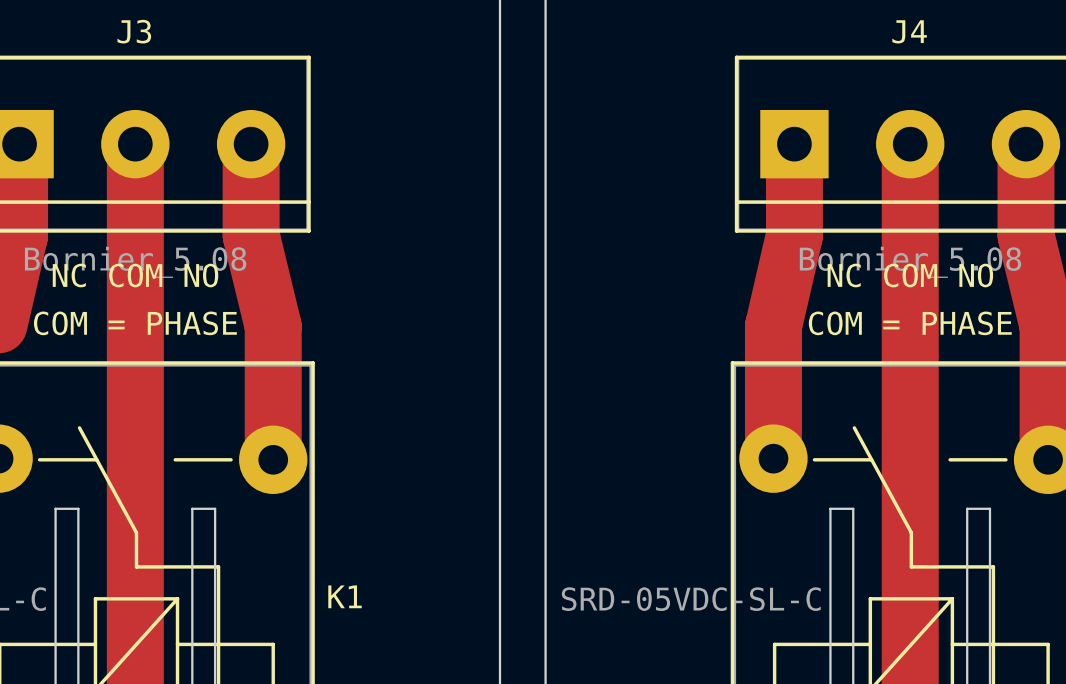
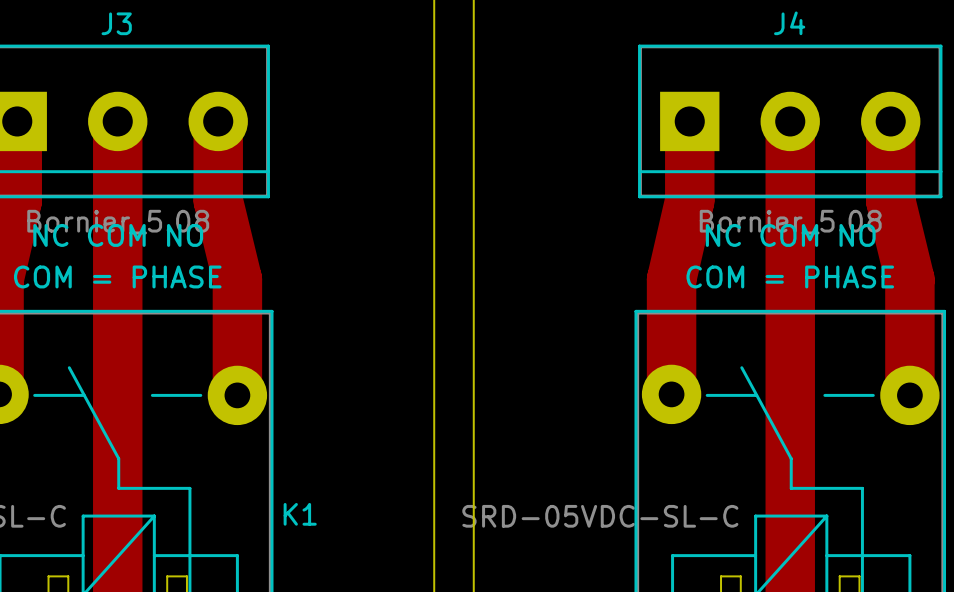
board edge: (55, 668) (55, 508) (78, 508) (78, 668) -> (48, 576) (68, 576)
board edge: (192, 668) (192, 508) (215, 508) (215, 668) -> (167, 576) (186, 576)
board edge: (830, 668) (830, 508) (853, 508) (853, 668) -> (721, 576) (740, 576)
board edge: (967, 668) (967, 508) (989, 508) (989, 668) -> (839, 576) (859, 576)

